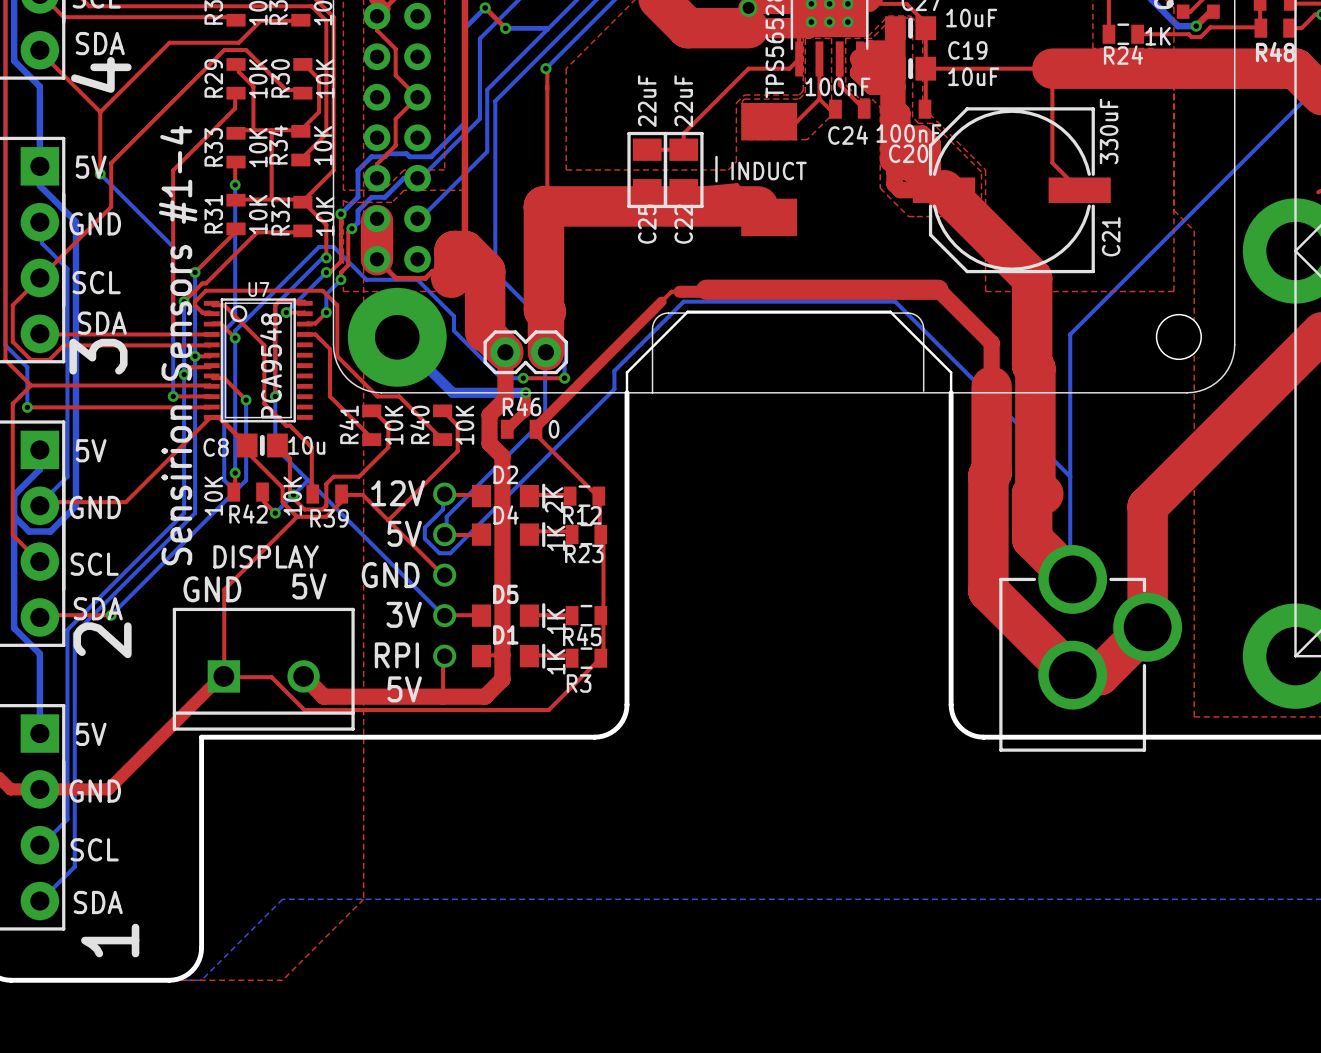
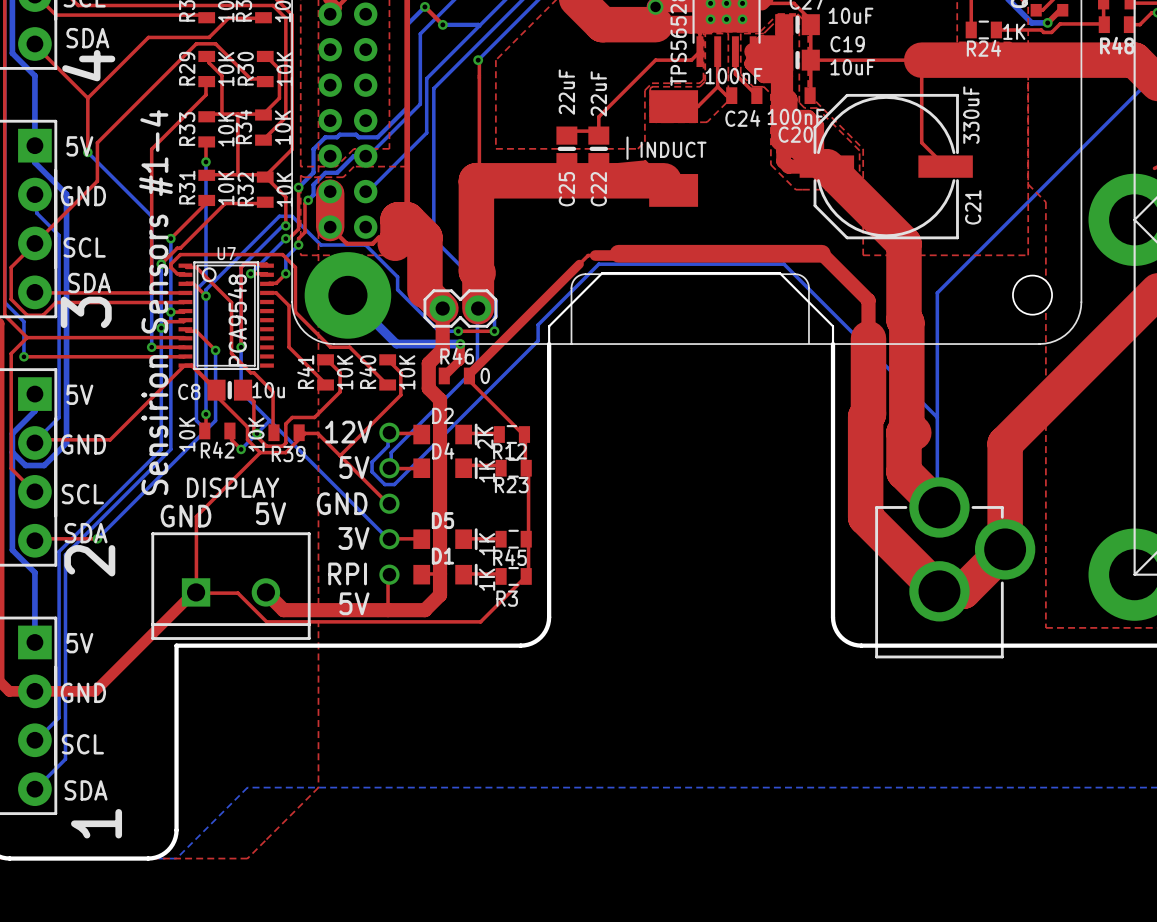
top track: (377, 16) (377, 30) (395, 48) (395, 75) (417, 97) (395, 119) (395, 145) (377, 164) (377, 178) -> none
C25 footprint: [627, 131, 668, 209] -> [556, 126, 578, 172]
C22 footprint: [663, 131, 704, 209] -> [588, 126, 610, 172]

